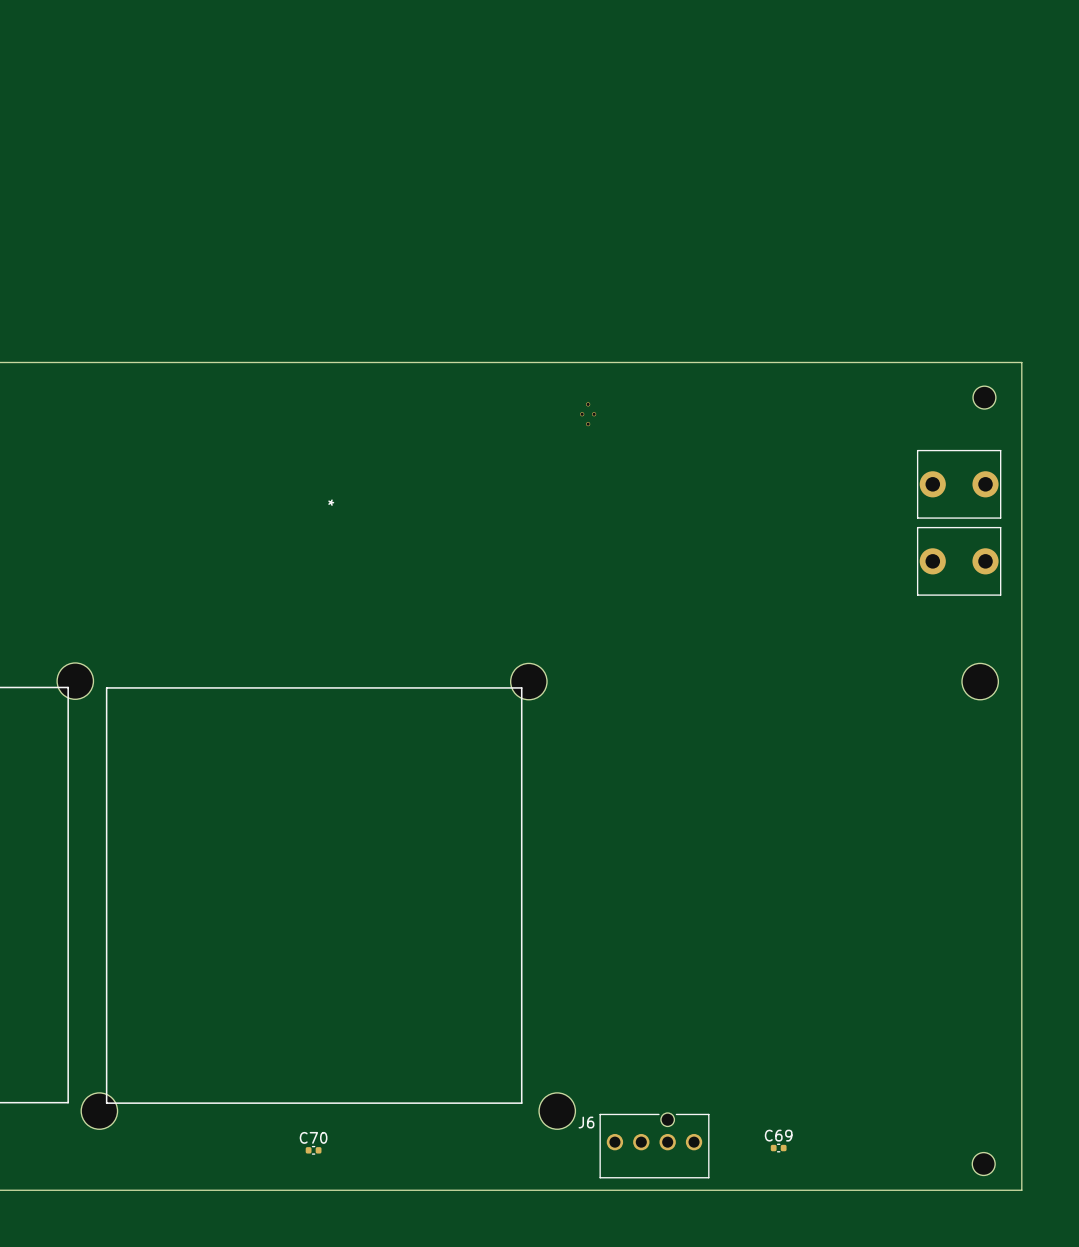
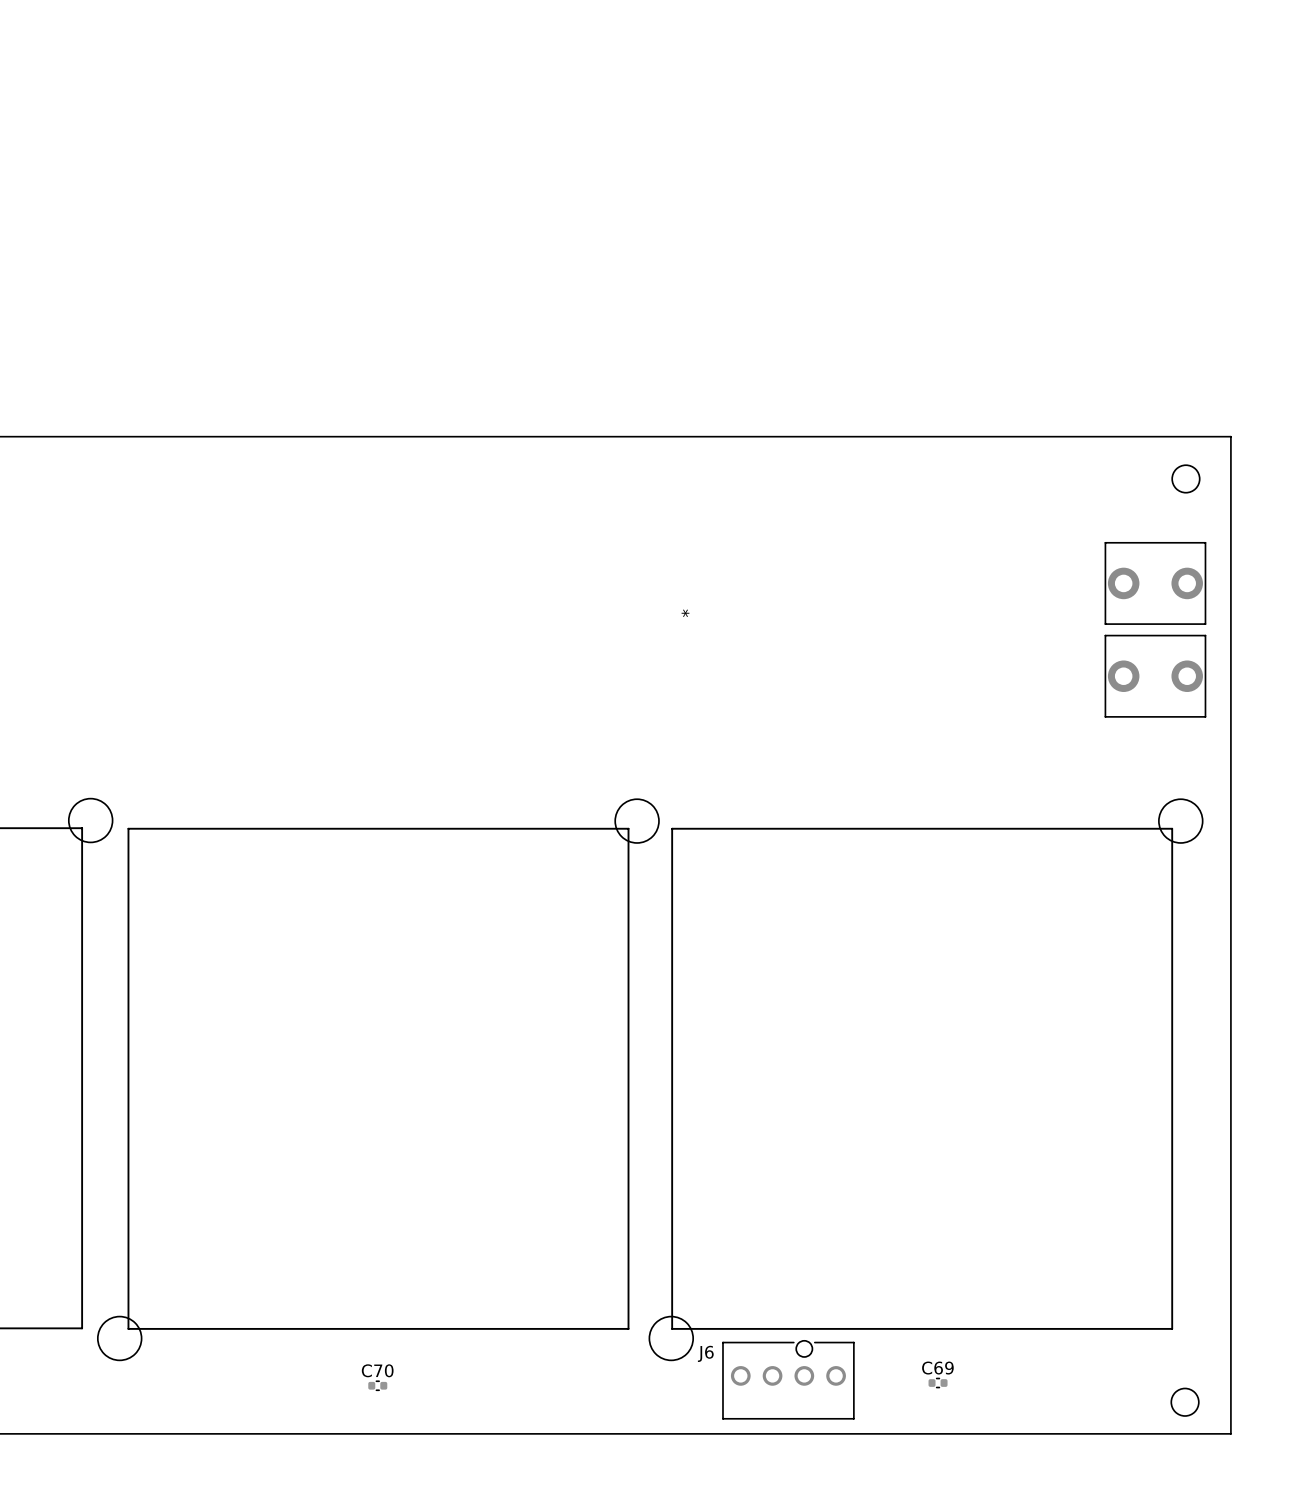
part: (588, 414) -> none
part position: (331, 502) -> (685, 613)
line: none -> (1172, 828) (672, 828) (672, 1328) (1172, 1328) (1172, 828)

